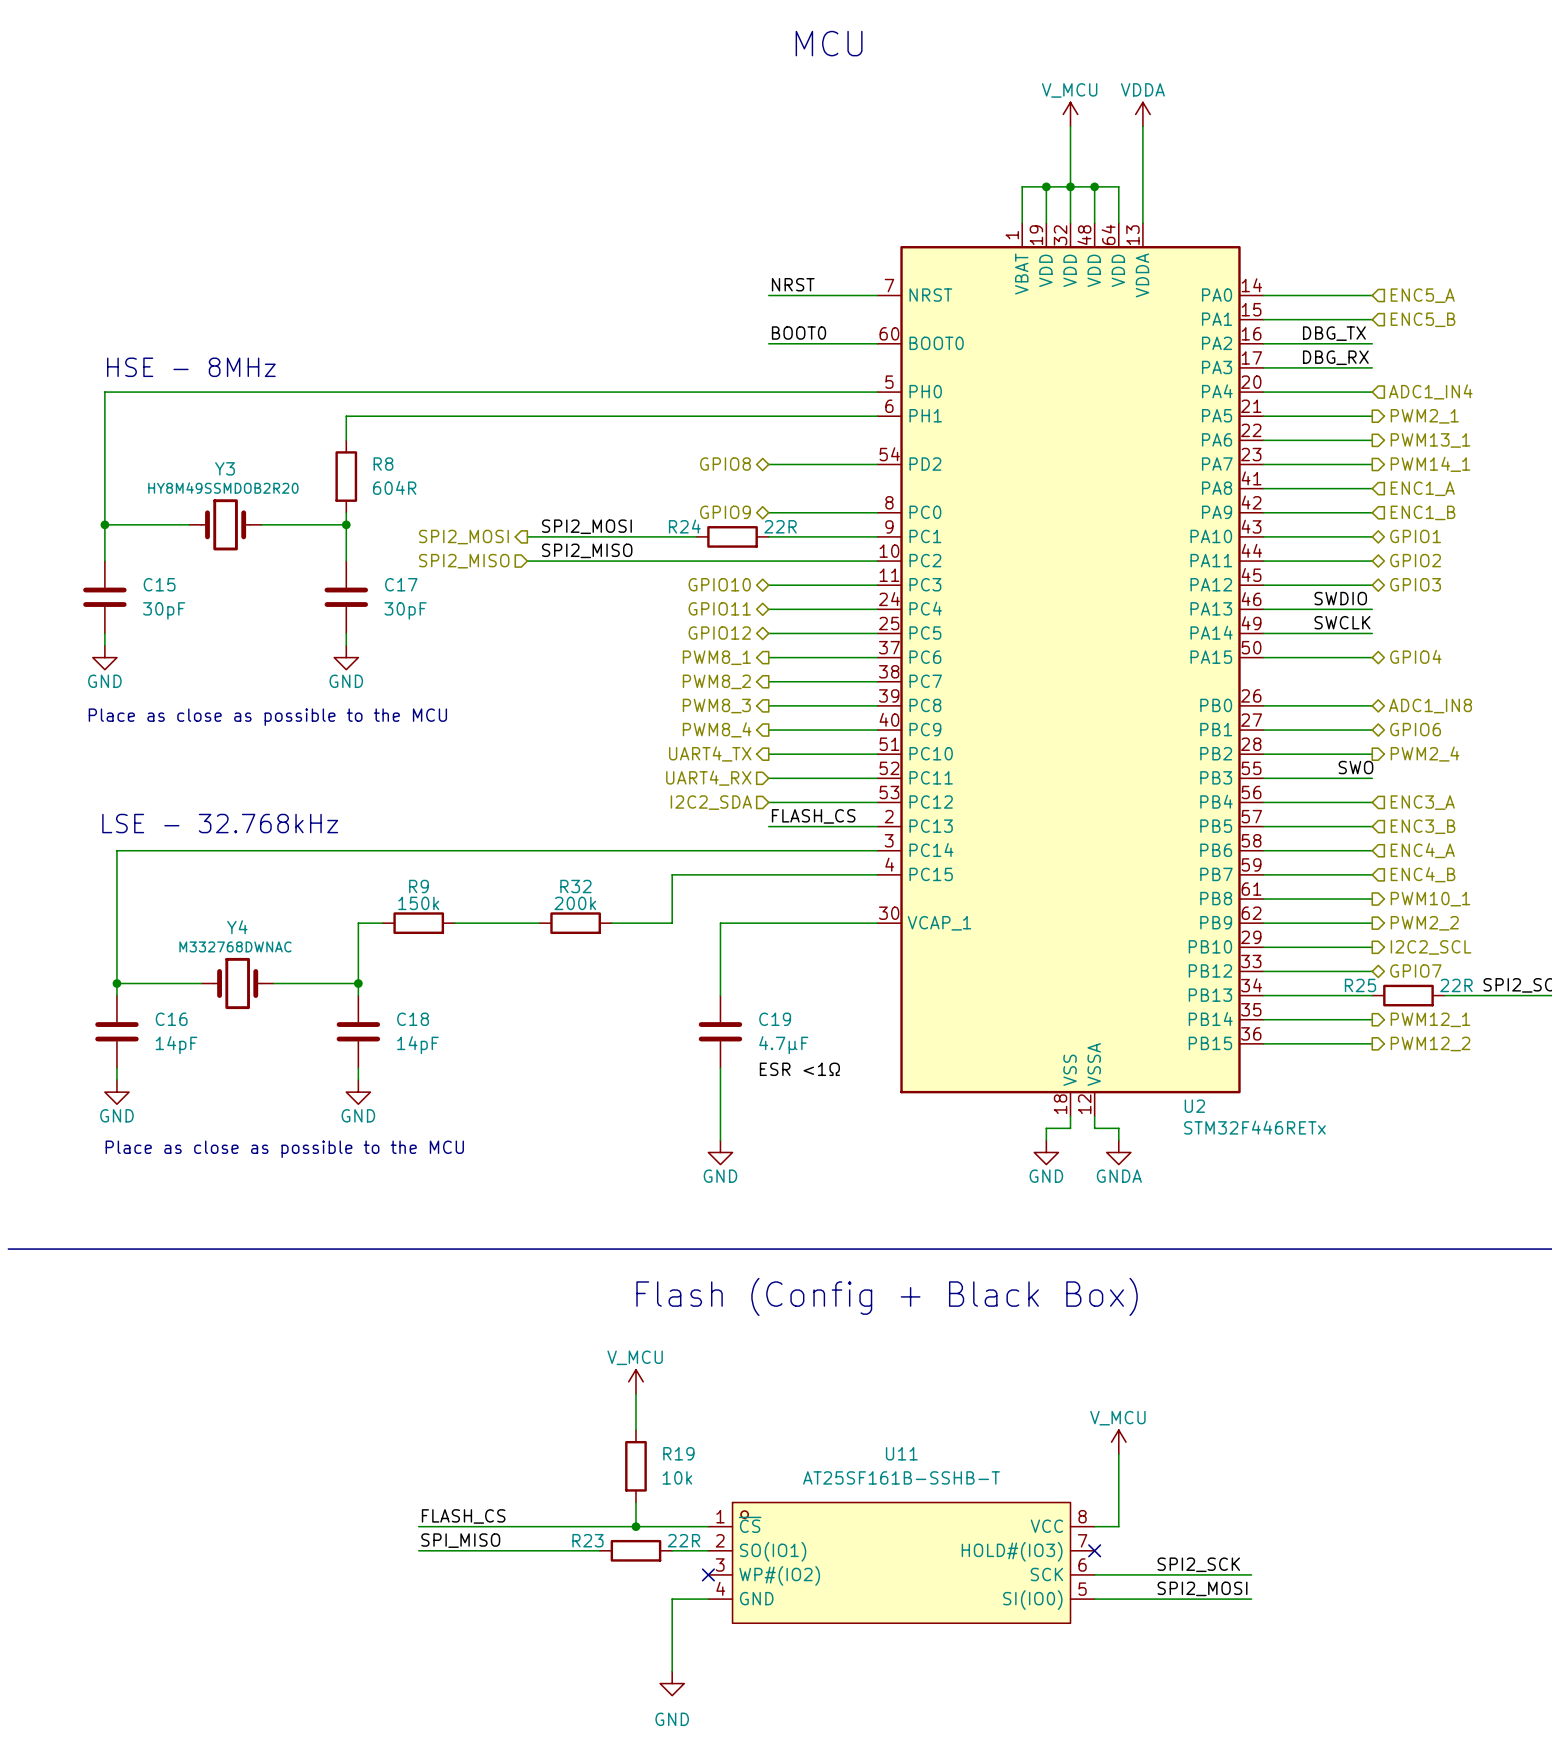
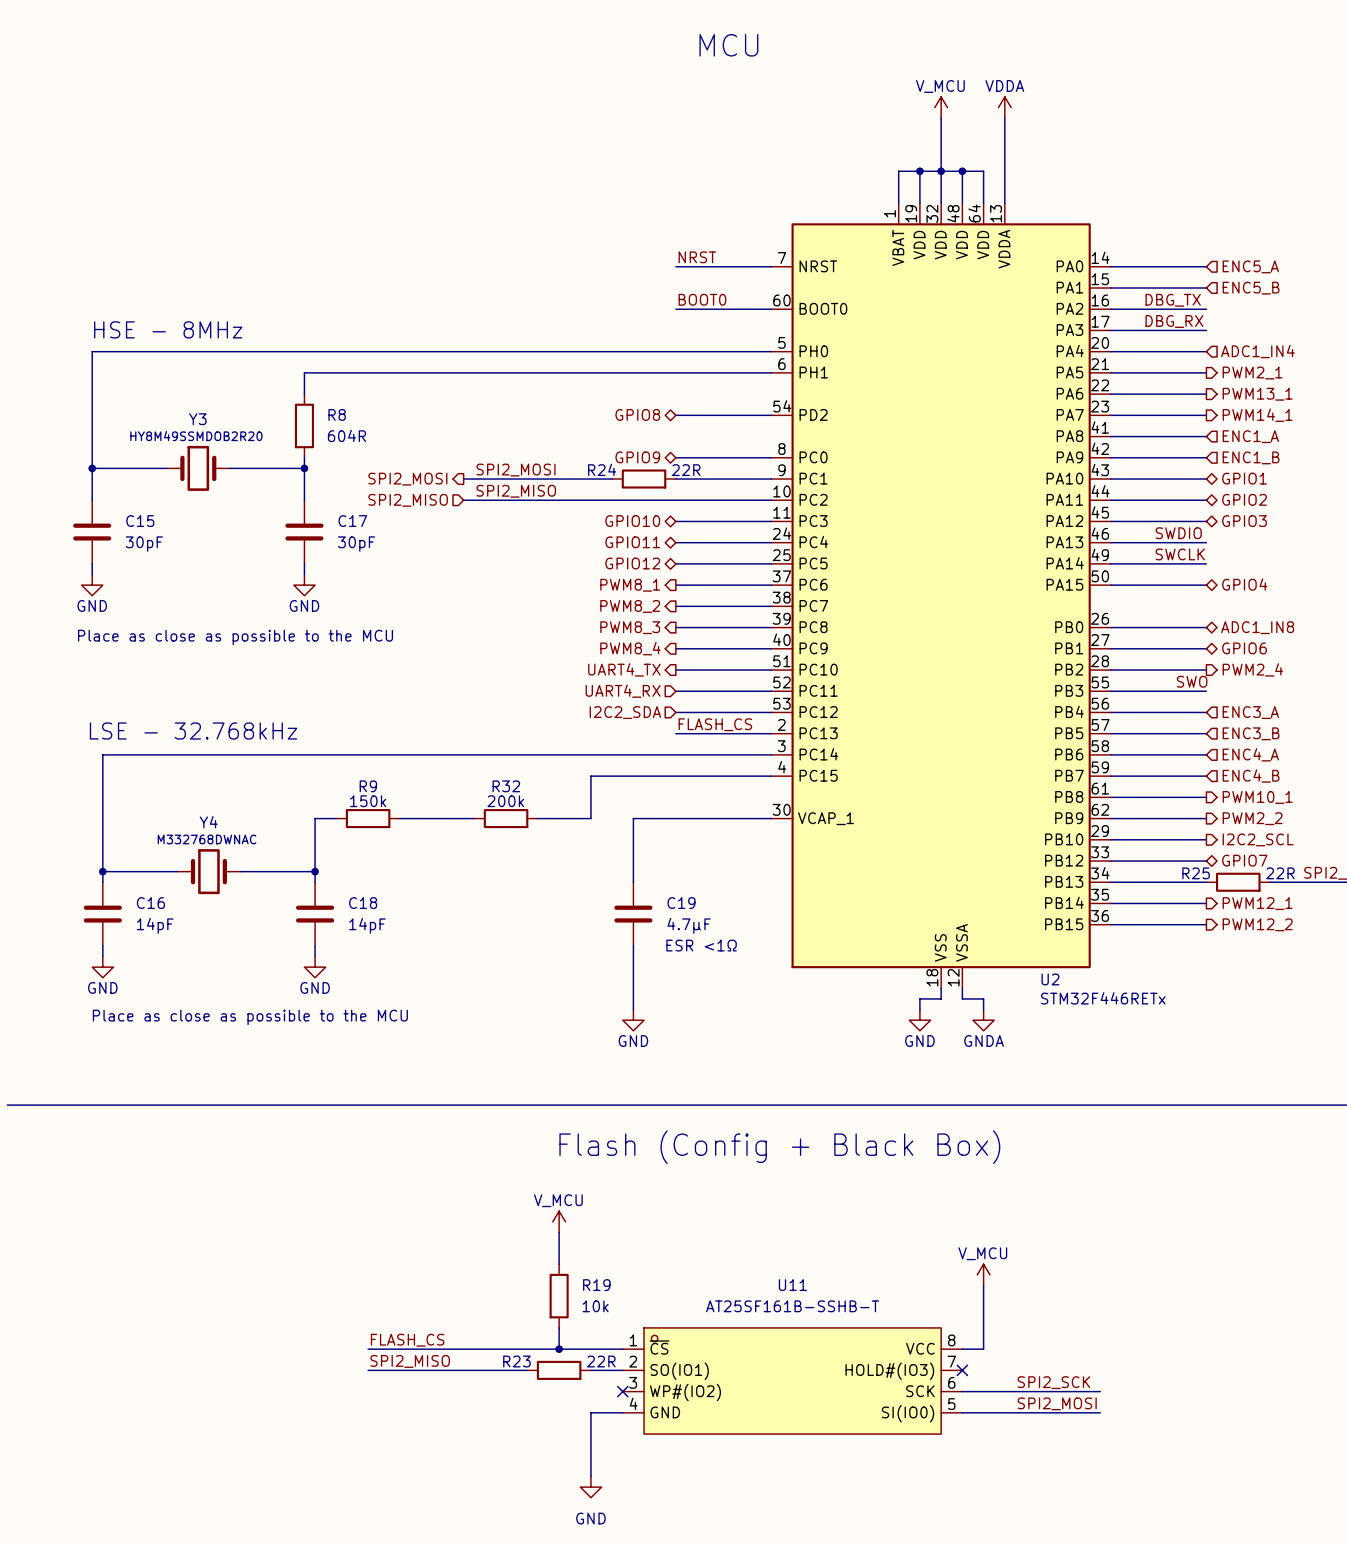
text: none -> ESR <1Ω (701, 945)
label: ESR <1Ω (799, 1069) -> none
label: SPI_MISO (460, 1540) -> SPI2_MISO (410, 1361)

